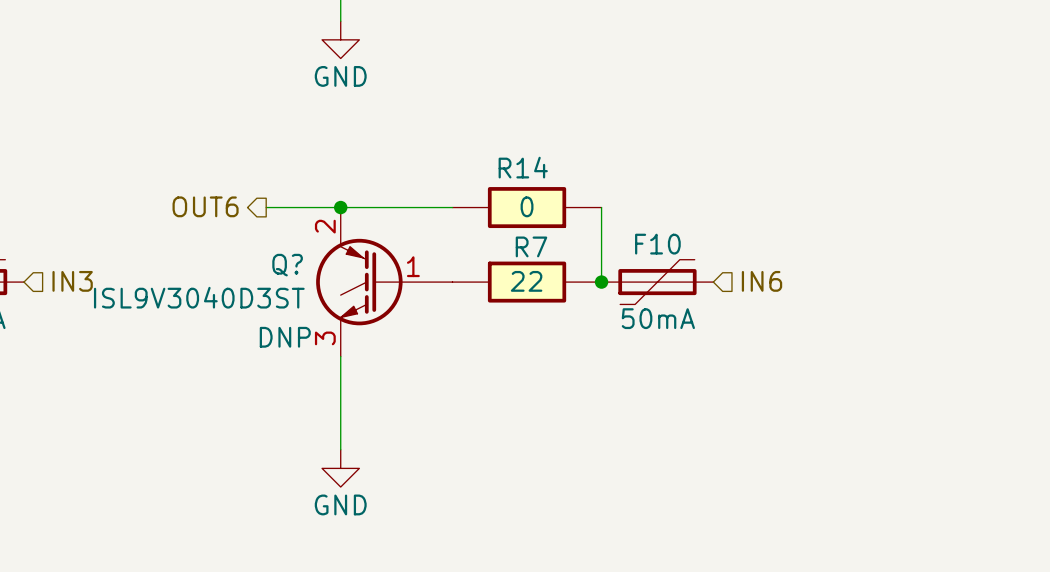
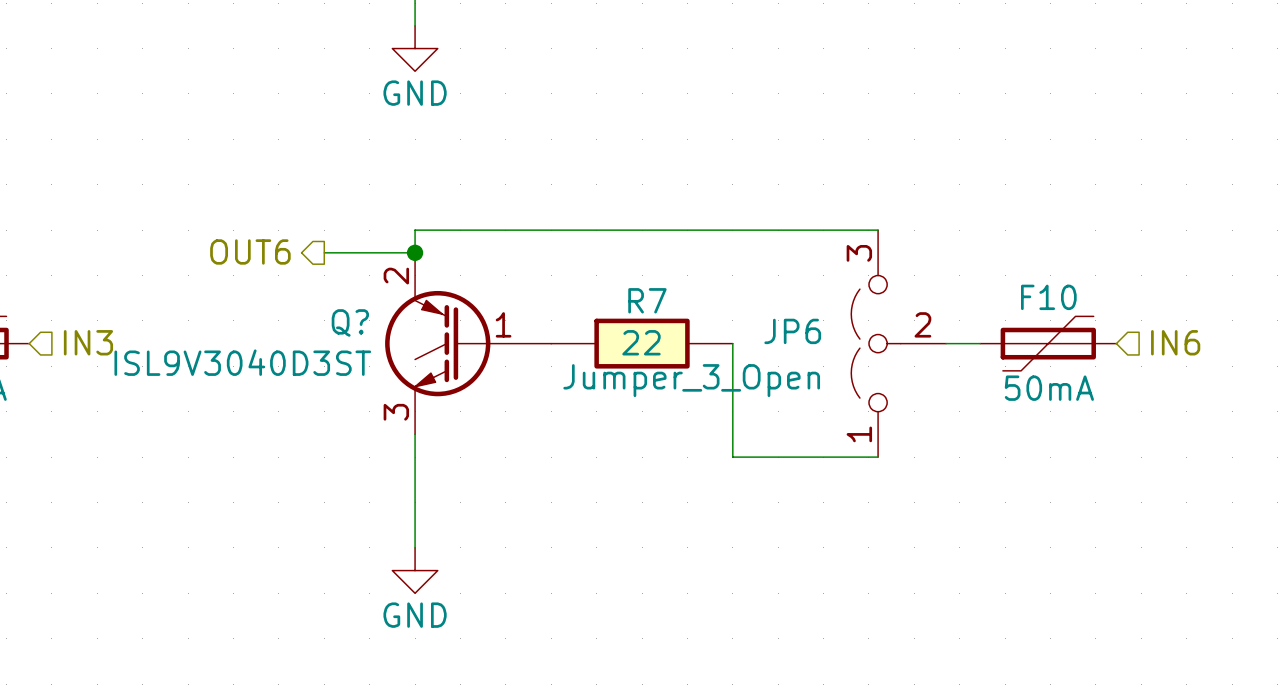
wire: (340, 207) (452, 207) -> (415, 252) (415, 230) (878, 230)
R14: 0 (527, 207) -> none
wire: (601, 207) (601, 282) -> (878, 457) (732, 457) (732, 343)
hierarchical label position: IN6 (761, 281) -> IN6 (1175, 342)
junction: (601, 282) -> none
F10 position: (657, 282) -> (1048, 343)
JP6: none -> Jumper_3_Open (898, 343)
wire: none -> (946, 343) (980, 343)
Q? text: DNP (285, 337) -> none

